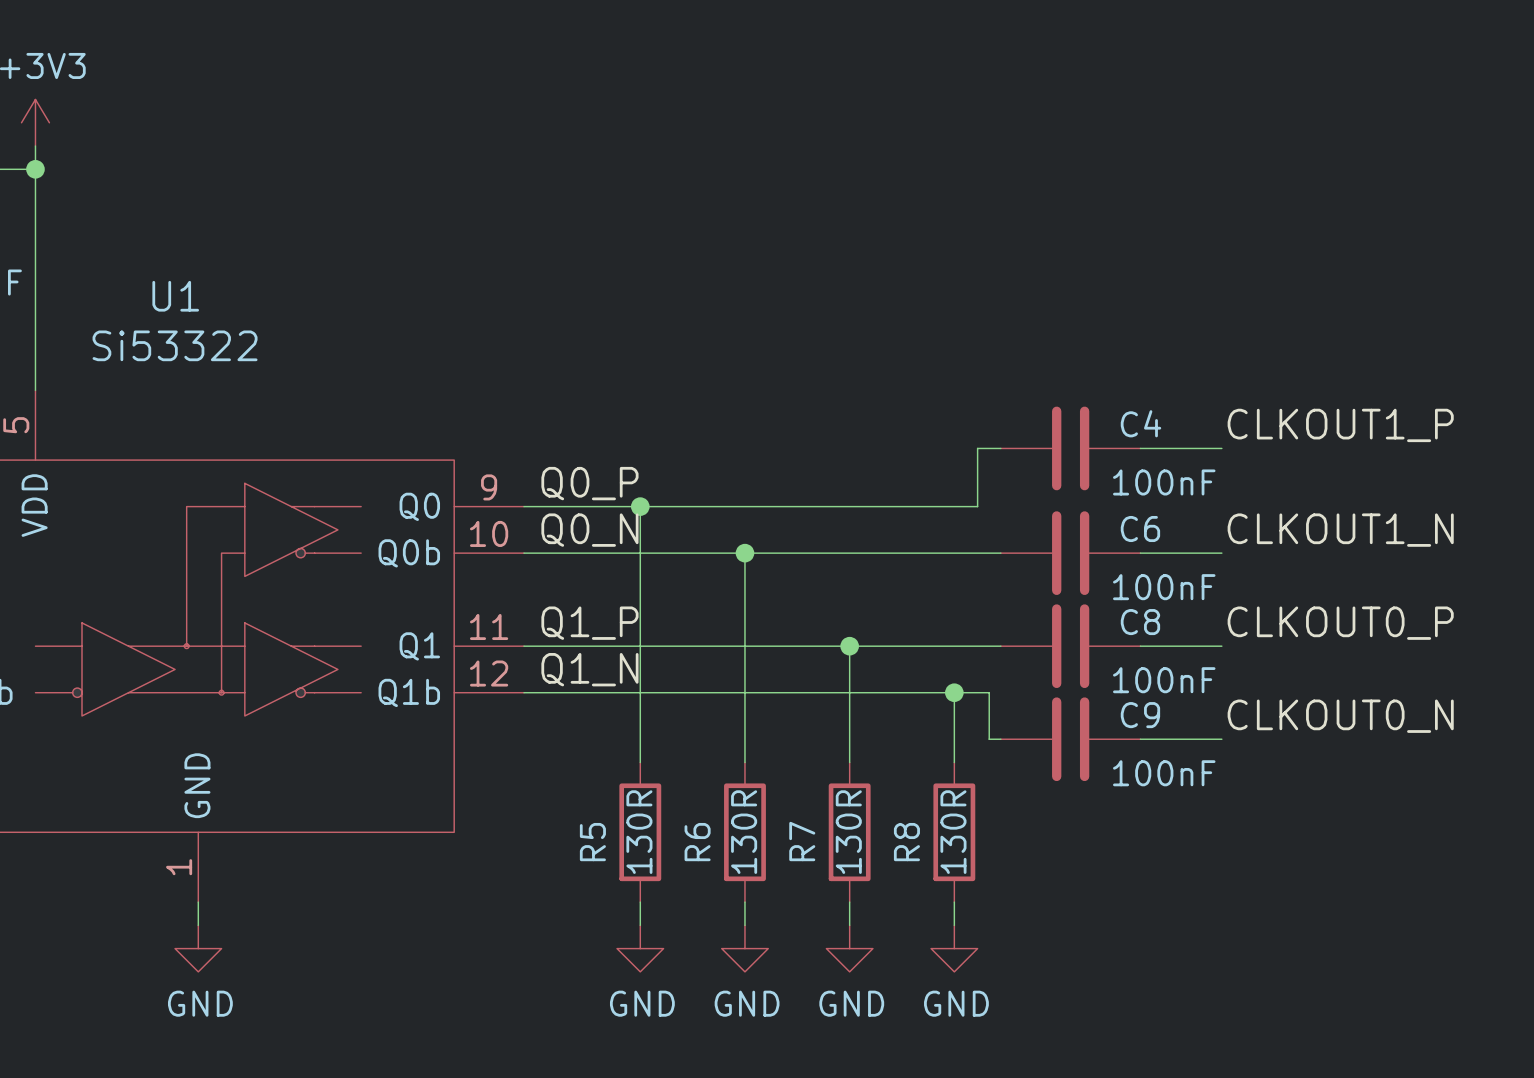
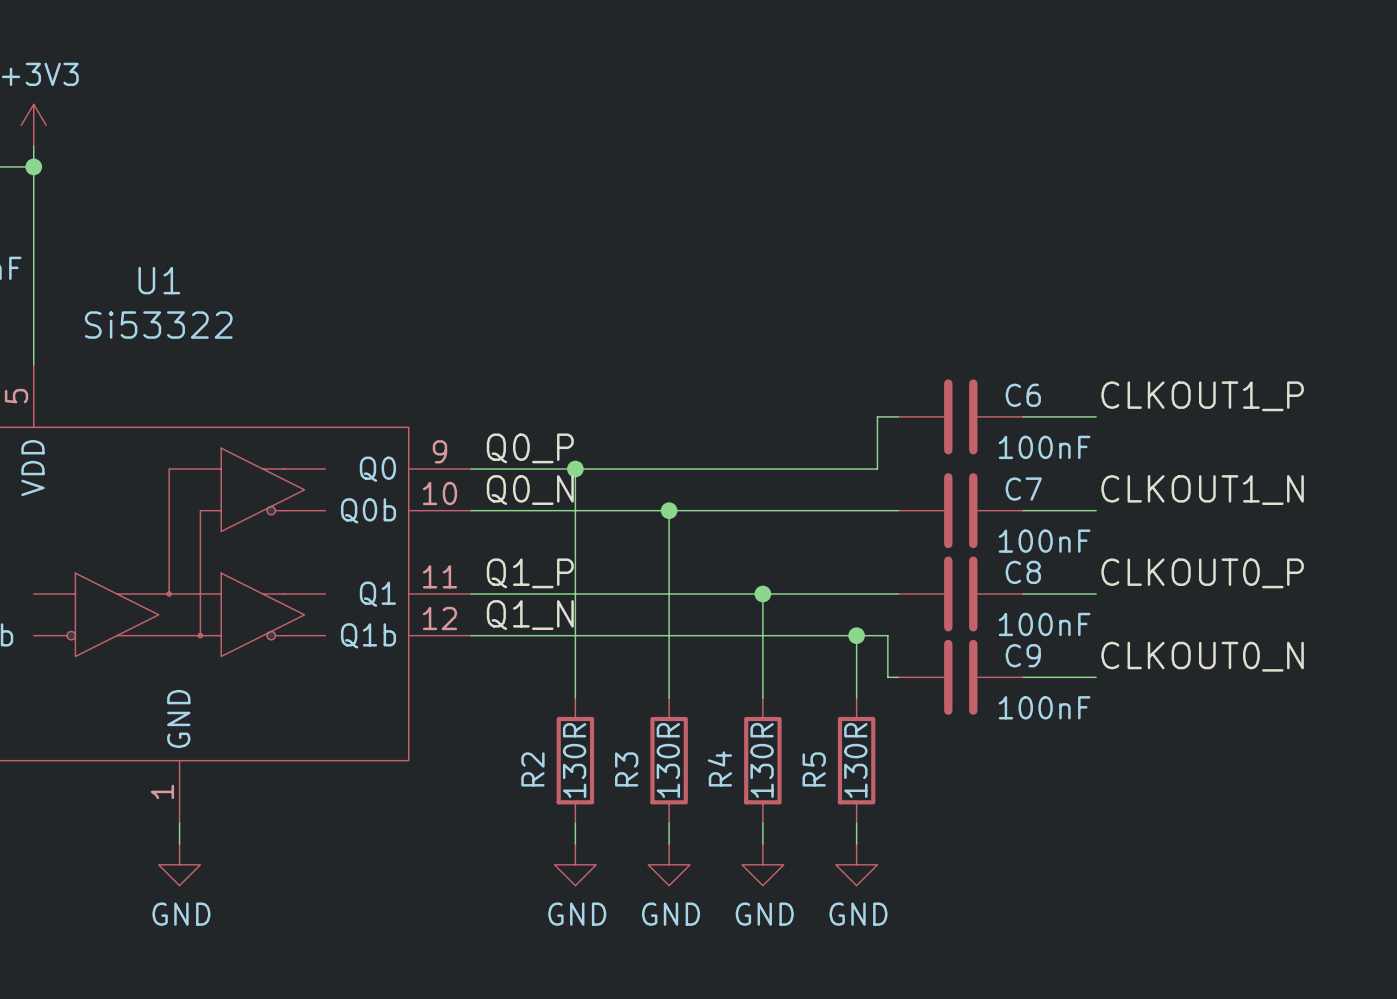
C4 name: C4 (1141, 423) -> C6 (1023, 395)
C6 name: C6 (1140, 529) -> C7 (1023, 489)
R7 name: R7 (802, 841) -> R4 (719, 768)
R5 name: R5 (592, 842) -> R2 (532, 769)
R6 name: R6 (697, 842) -> R3 (626, 769)
R8 name: R8 (906, 842) -> R5 (814, 769)

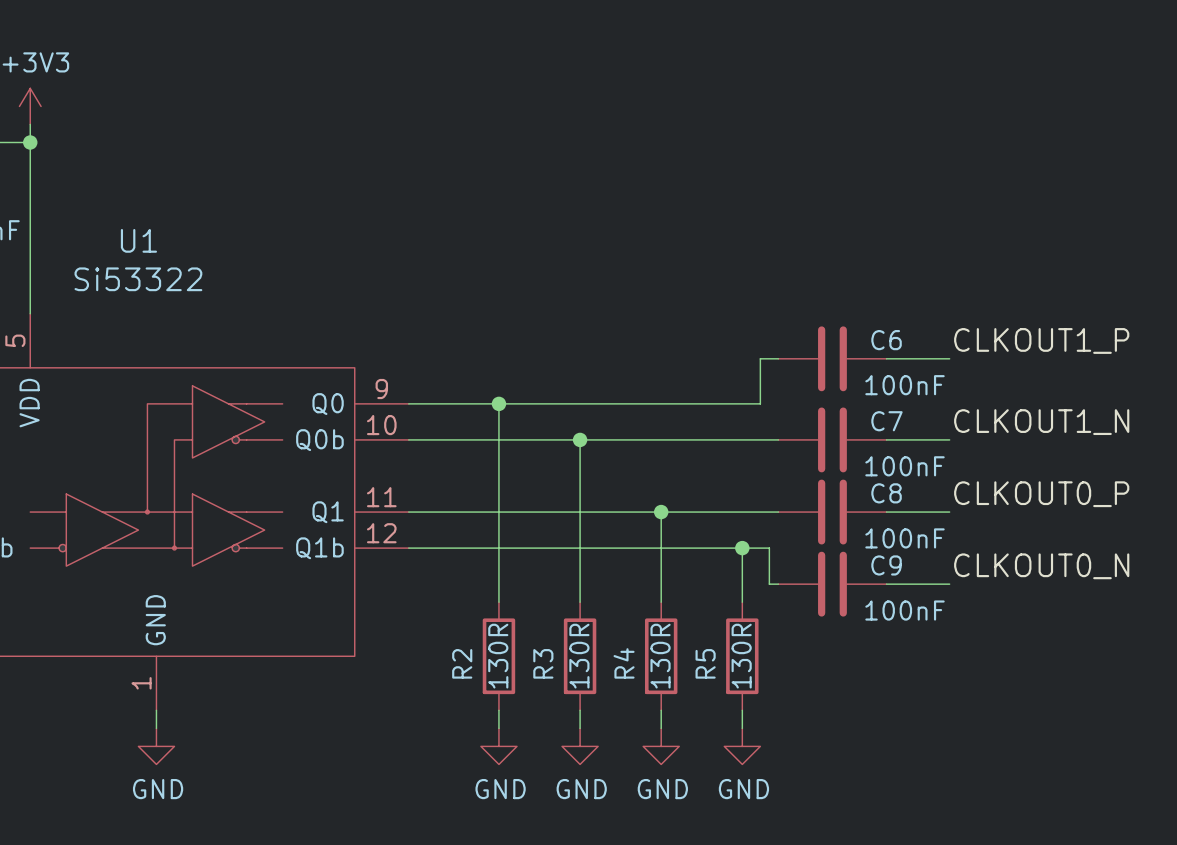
label: Q0_P (530, 448) -> none
label: Q0_N (530, 490) -> none
label: Q1_P (530, 573) -> none
label: Q1_N (530, 615) -> none

